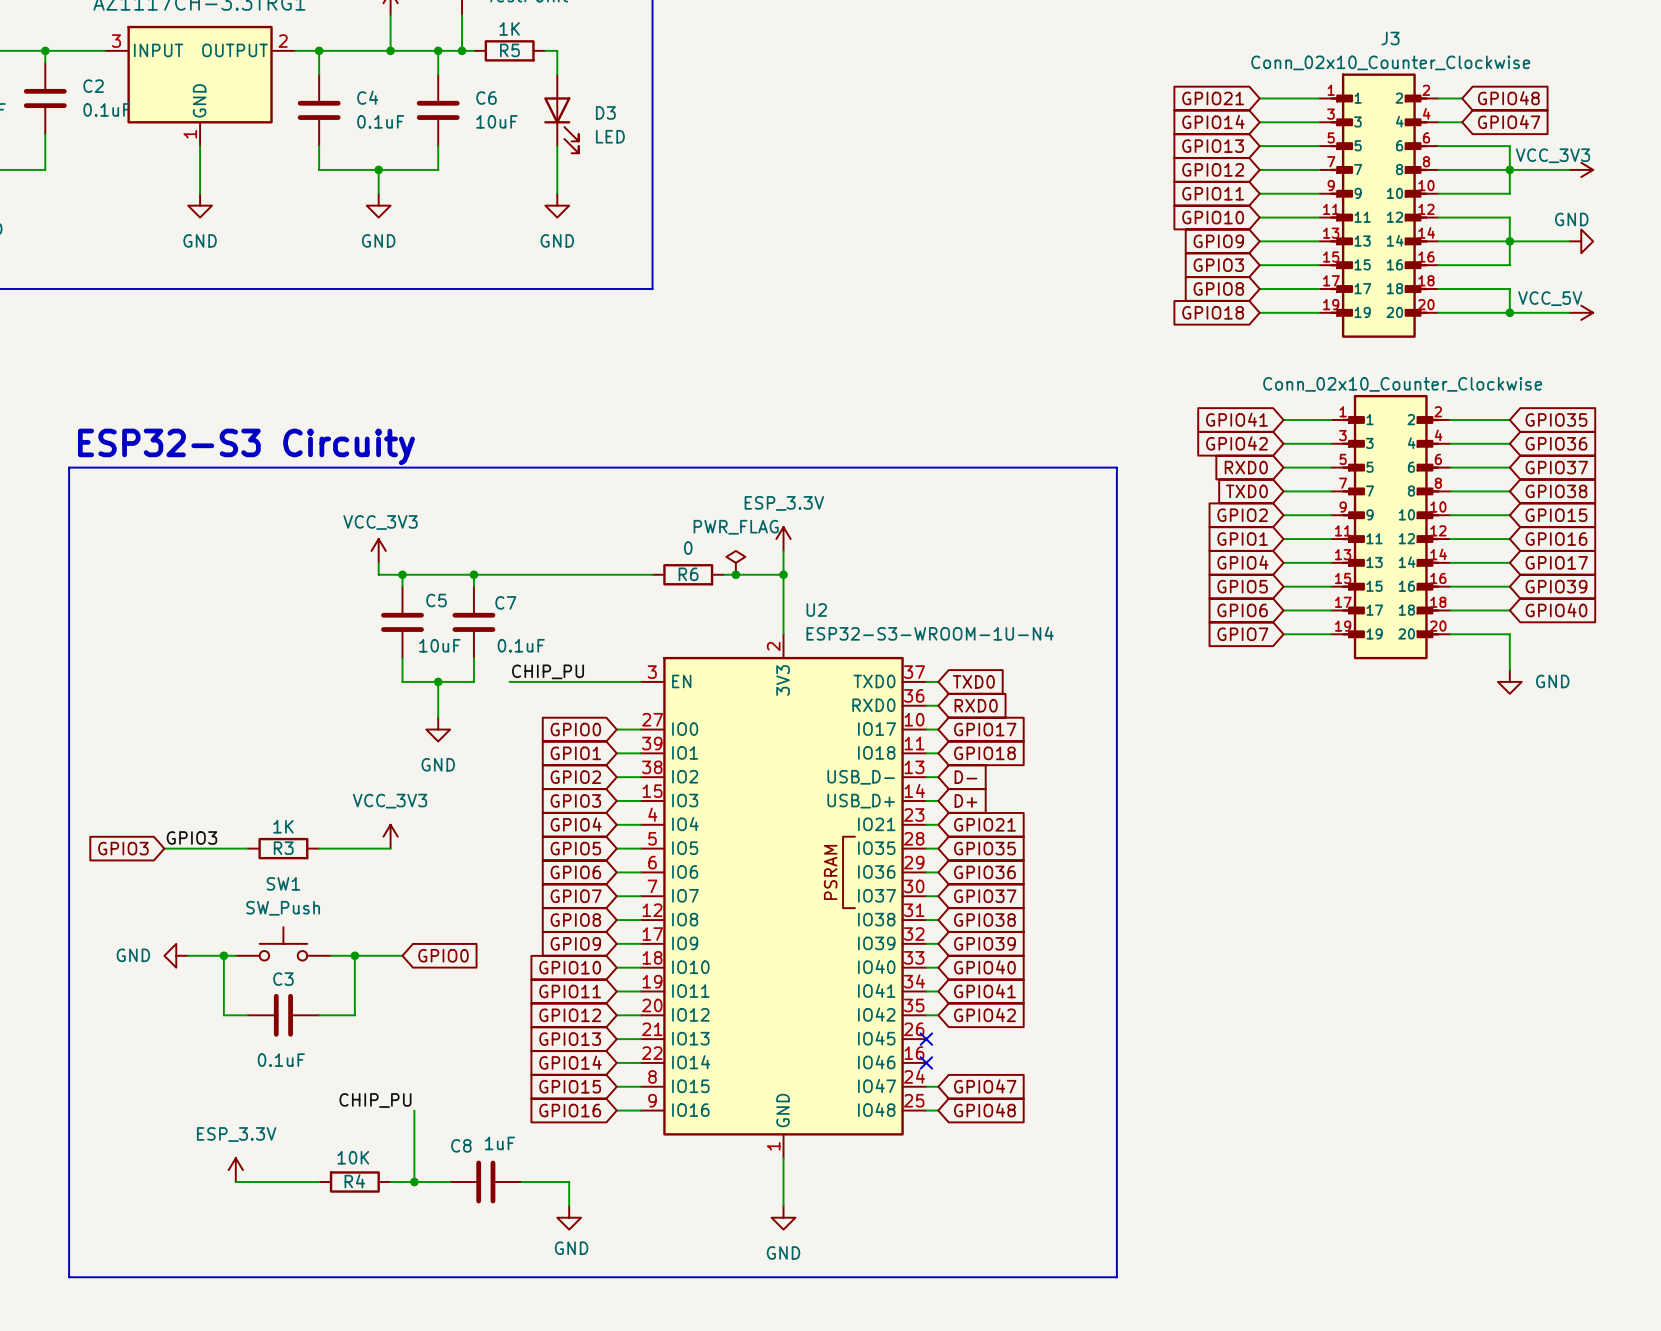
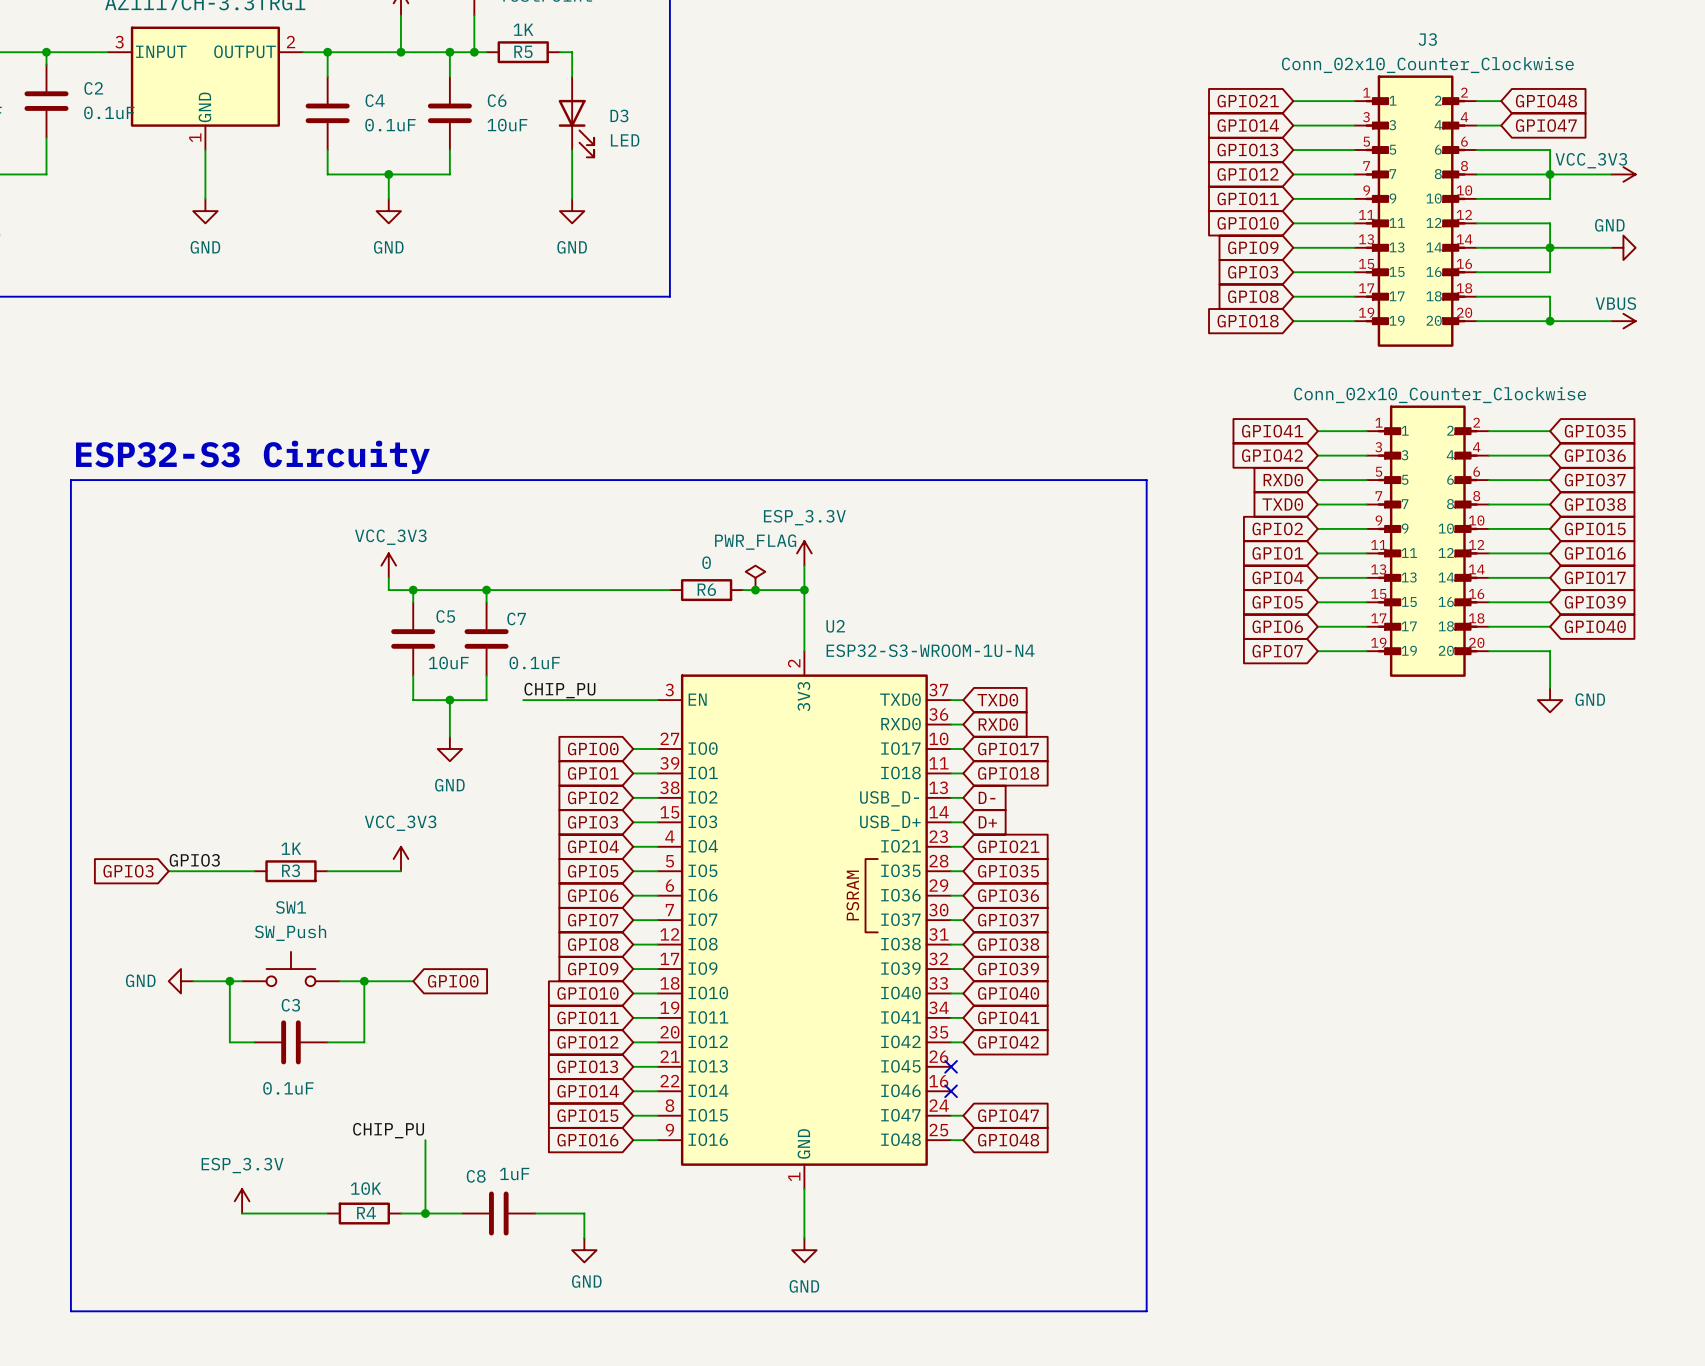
power symbol: VCC_5V (1581, 312) -> VBUS (1623, 321)

